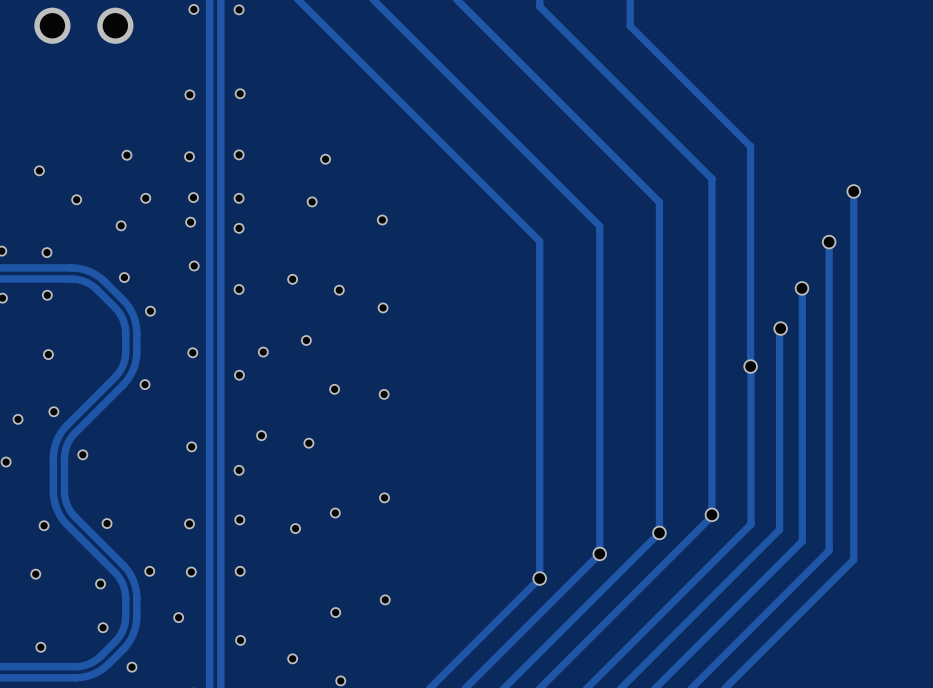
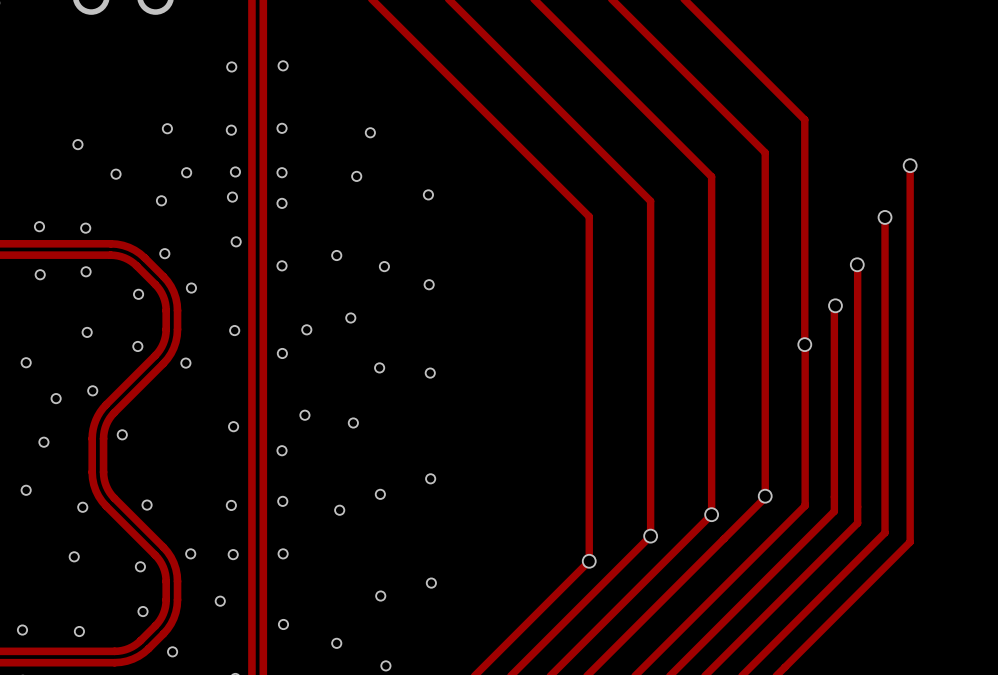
via: none -> (138, 294)
via: none -> (137, 346)

